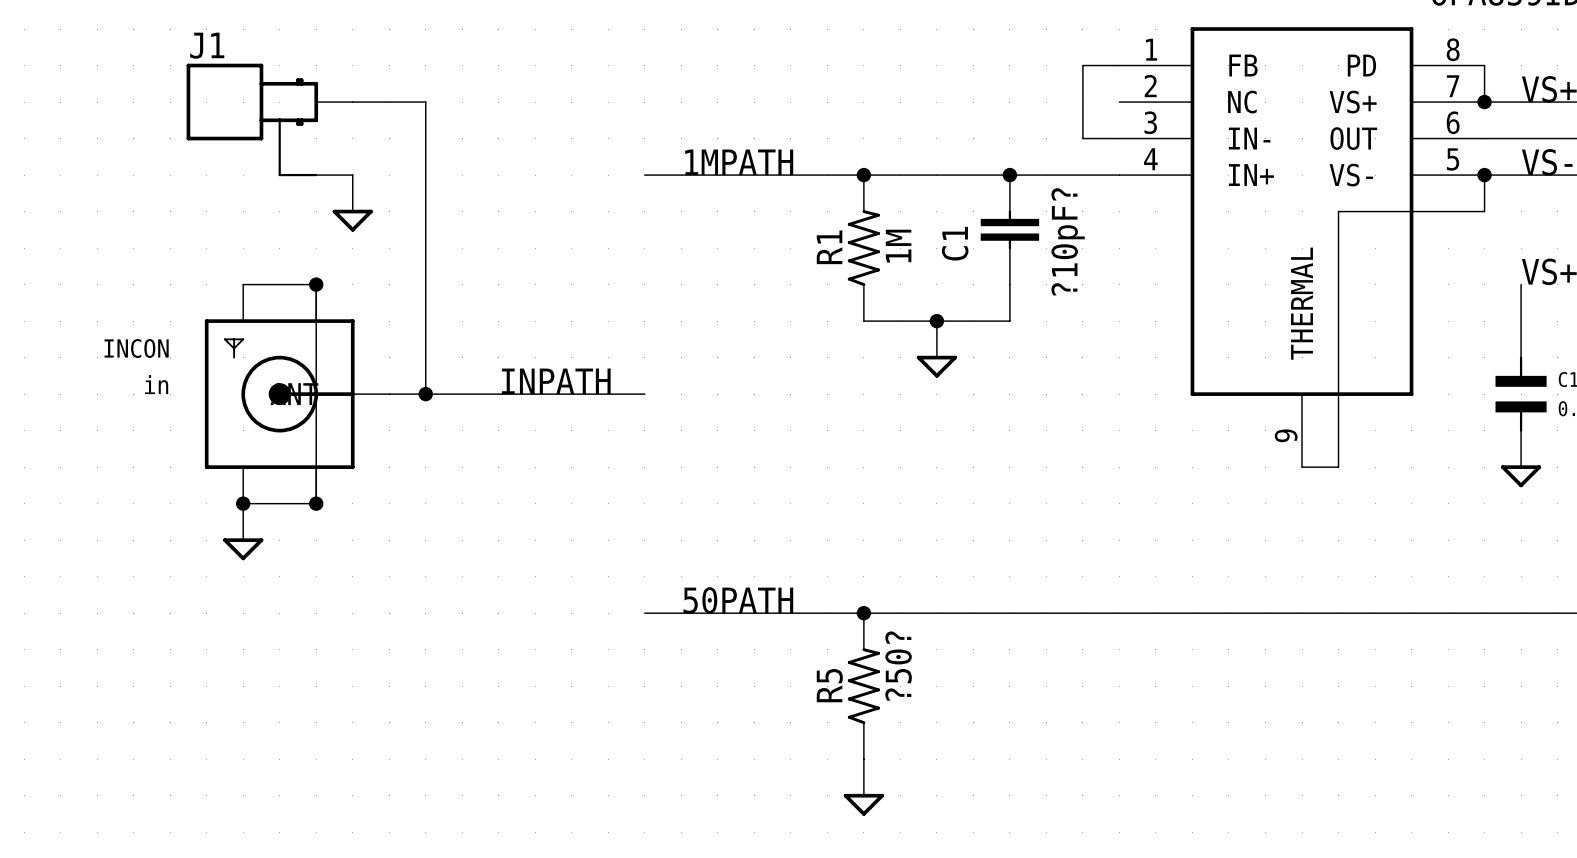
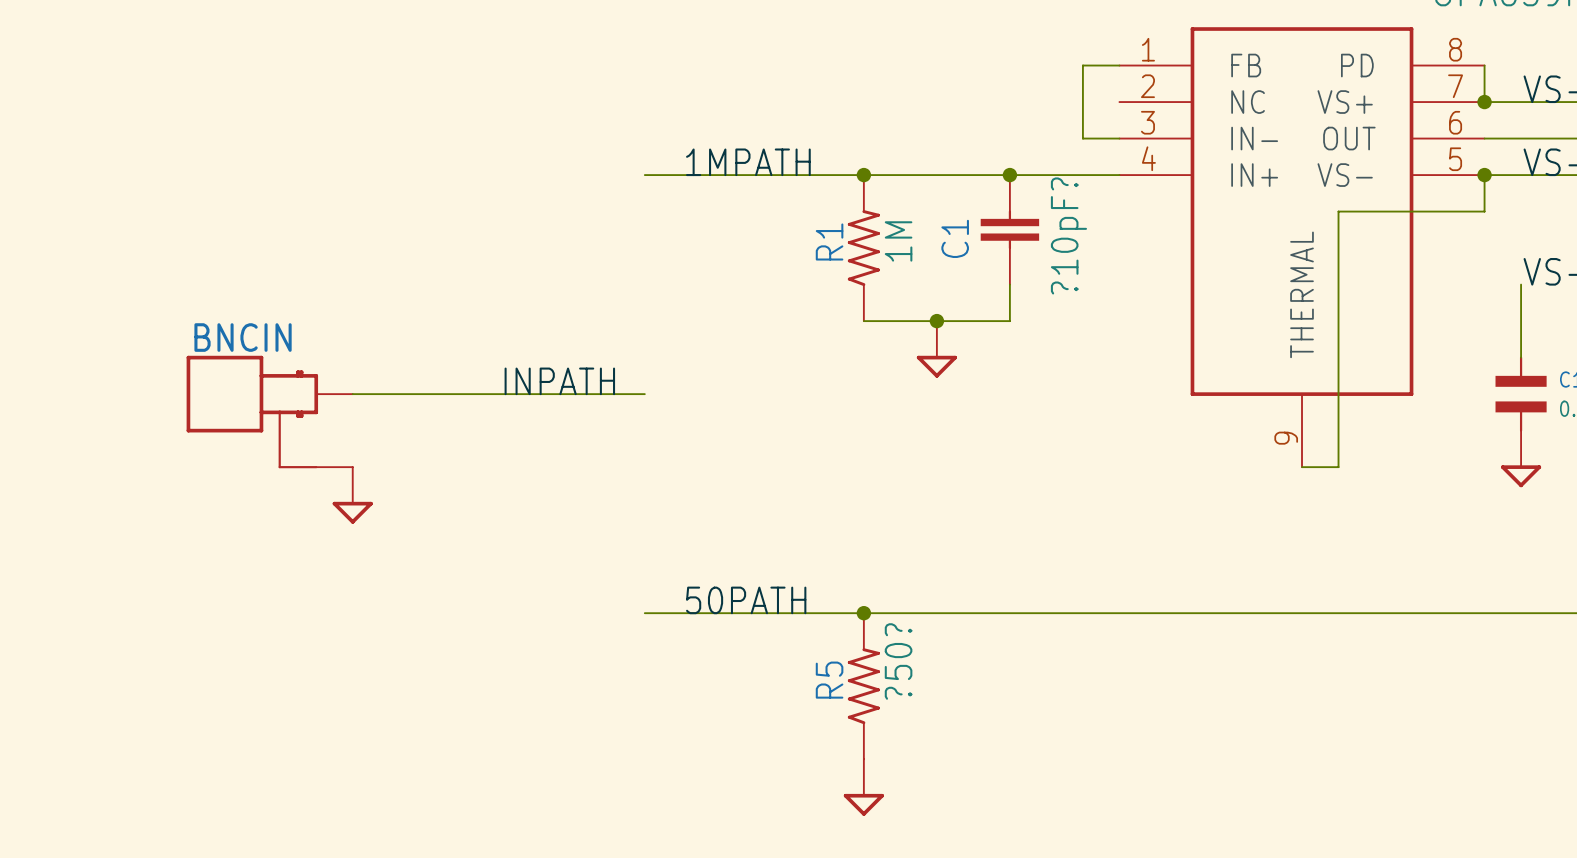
wire: (352, 102) (425, 102) (425, 394) -> none
J1: (269, 119) -> none
power symbol: (352, 203) -> none
wire: (243, 284) (316, 284) (316, 503) (243, 503) -> none
junction: (316, 284) -> none
INCON: in (297, 394) -> none
junction: (425, 394) -> none
BNCIN: none -> (269, 412)
junction: (243, 503) -> none
junction: (316, 503) -> none
power symbol position: (243, 531) -> (352, 495)

